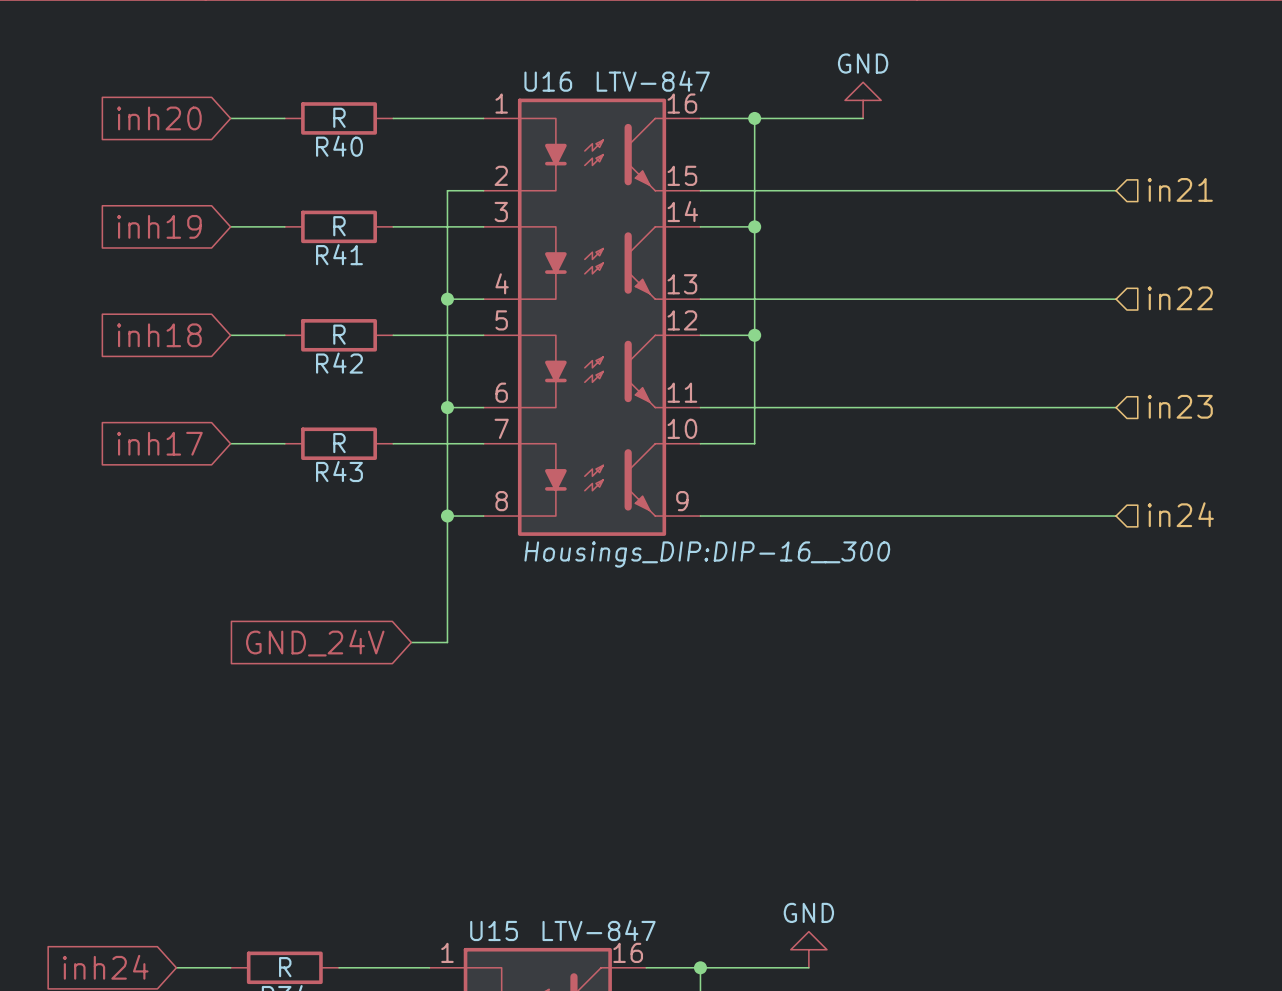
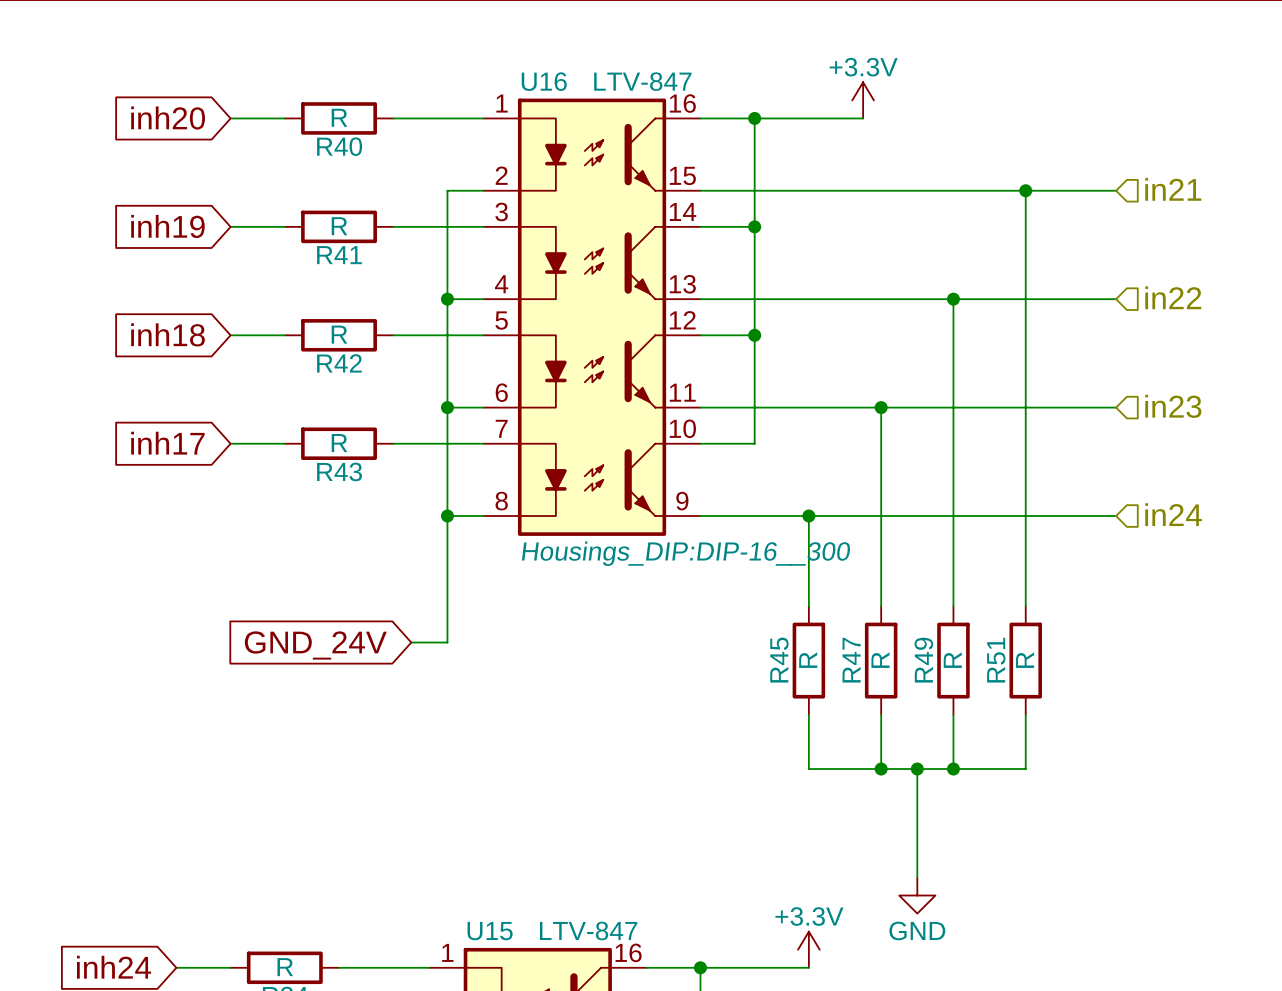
power symbol: GND (863, 100) -> +3.3V (863, 100)
wire: none -> (1025, 190) (1025, 606)
junction: none -> (1025, 190)
wire: none -> (953, 299) (953, 606)
junction: none -> (953, 299)
wire: none -> (881, 407) (881, 606)
junction: none -> (881, 407)
wire: none -> (808, 516) (808, 606)
junction: none -> (808, 516)
R45: none -> R (808, 660)
R47: none -> R (881, 660)
R49: none -> R (953, 660)
R51: none -> R (1025, 660)
wire: none -> (808, 714) (808, 769) (1025, 769) (1025, 714)
wire: none -> (881, 714) (881, 769)
wire: none -> (953, 714) (953, 769)
junction: none -> (881, 769)
wire: none -> (917, 769) (917, 877)
junction: none -> (917, 769)
junction: none -> (953, 769)
power symbol: none -> GND (917, 895)
power symbol: GND (808, 949) -> +3.3V (808, 949)

